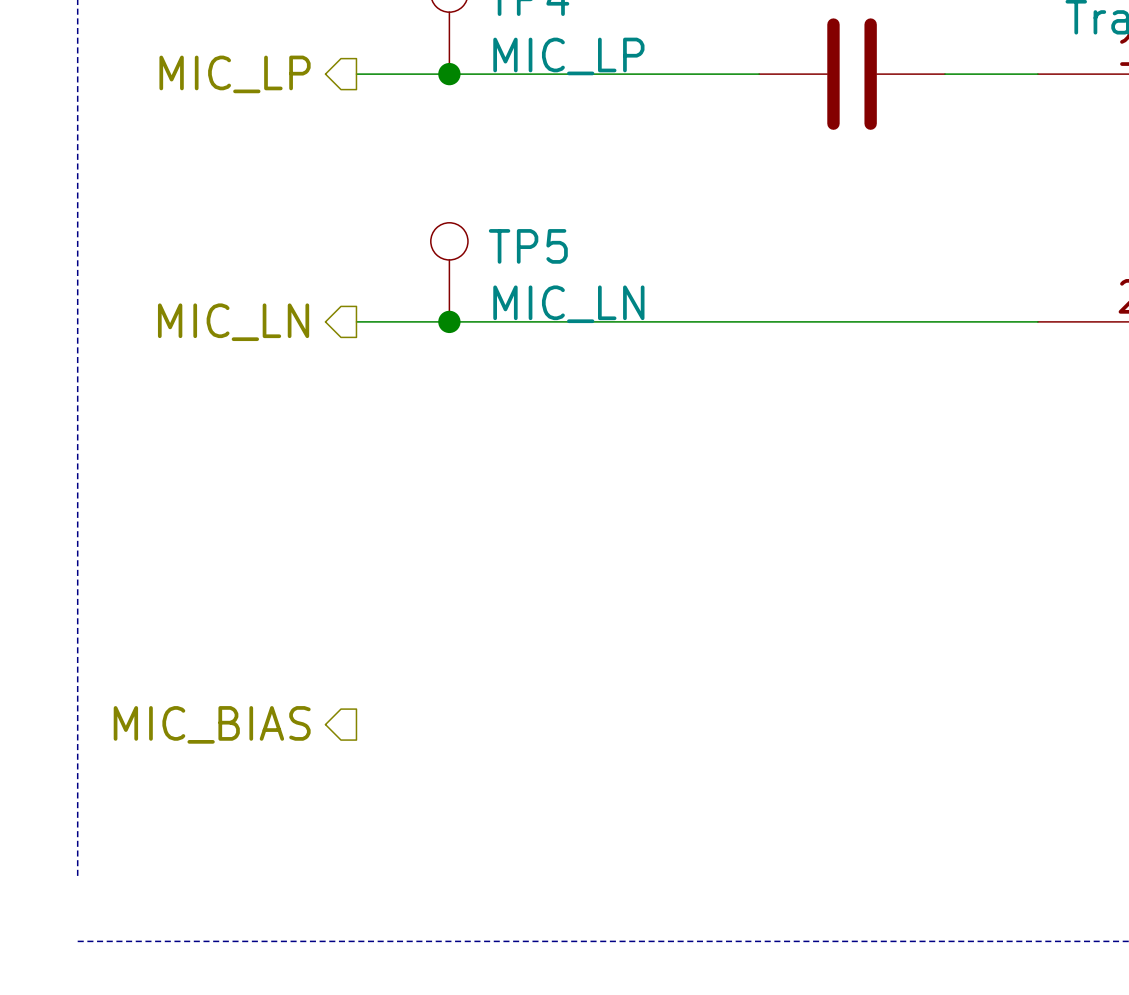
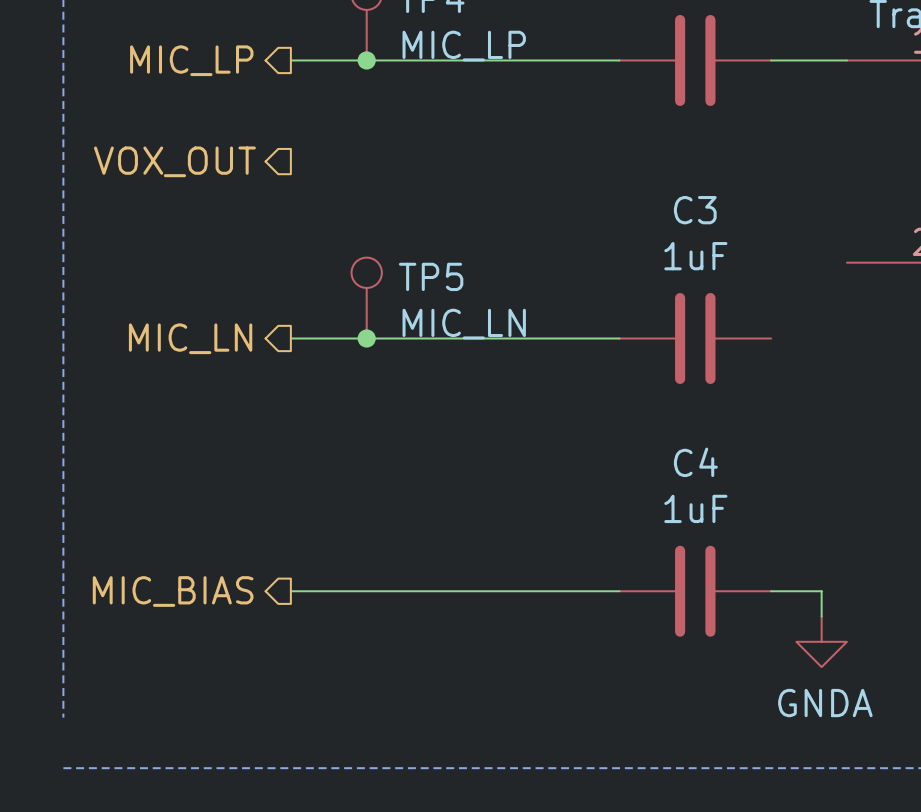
hierarchical label: none -> VOX_OUT (174, 161)
TP5 position: (449, 272) -> (366, 298)
wire: (356, 321) (1037, 321) -> none
junction position: (449, 321) -> (366, 338)
hierarchical label position: MIC_LN (233, 322) -> MIC_LN (190, 338)
wire: none -> (290, 338) (619, 338)
C3: none -> 1uF (695, 338)
wire: none -> (290, 591) (619, 591)
C4: none -> 1uF (695, 591)
wire: none -> (771, 591) (821, 591) (821, 616)
power symbol: none -> GNDA (821, 641)

